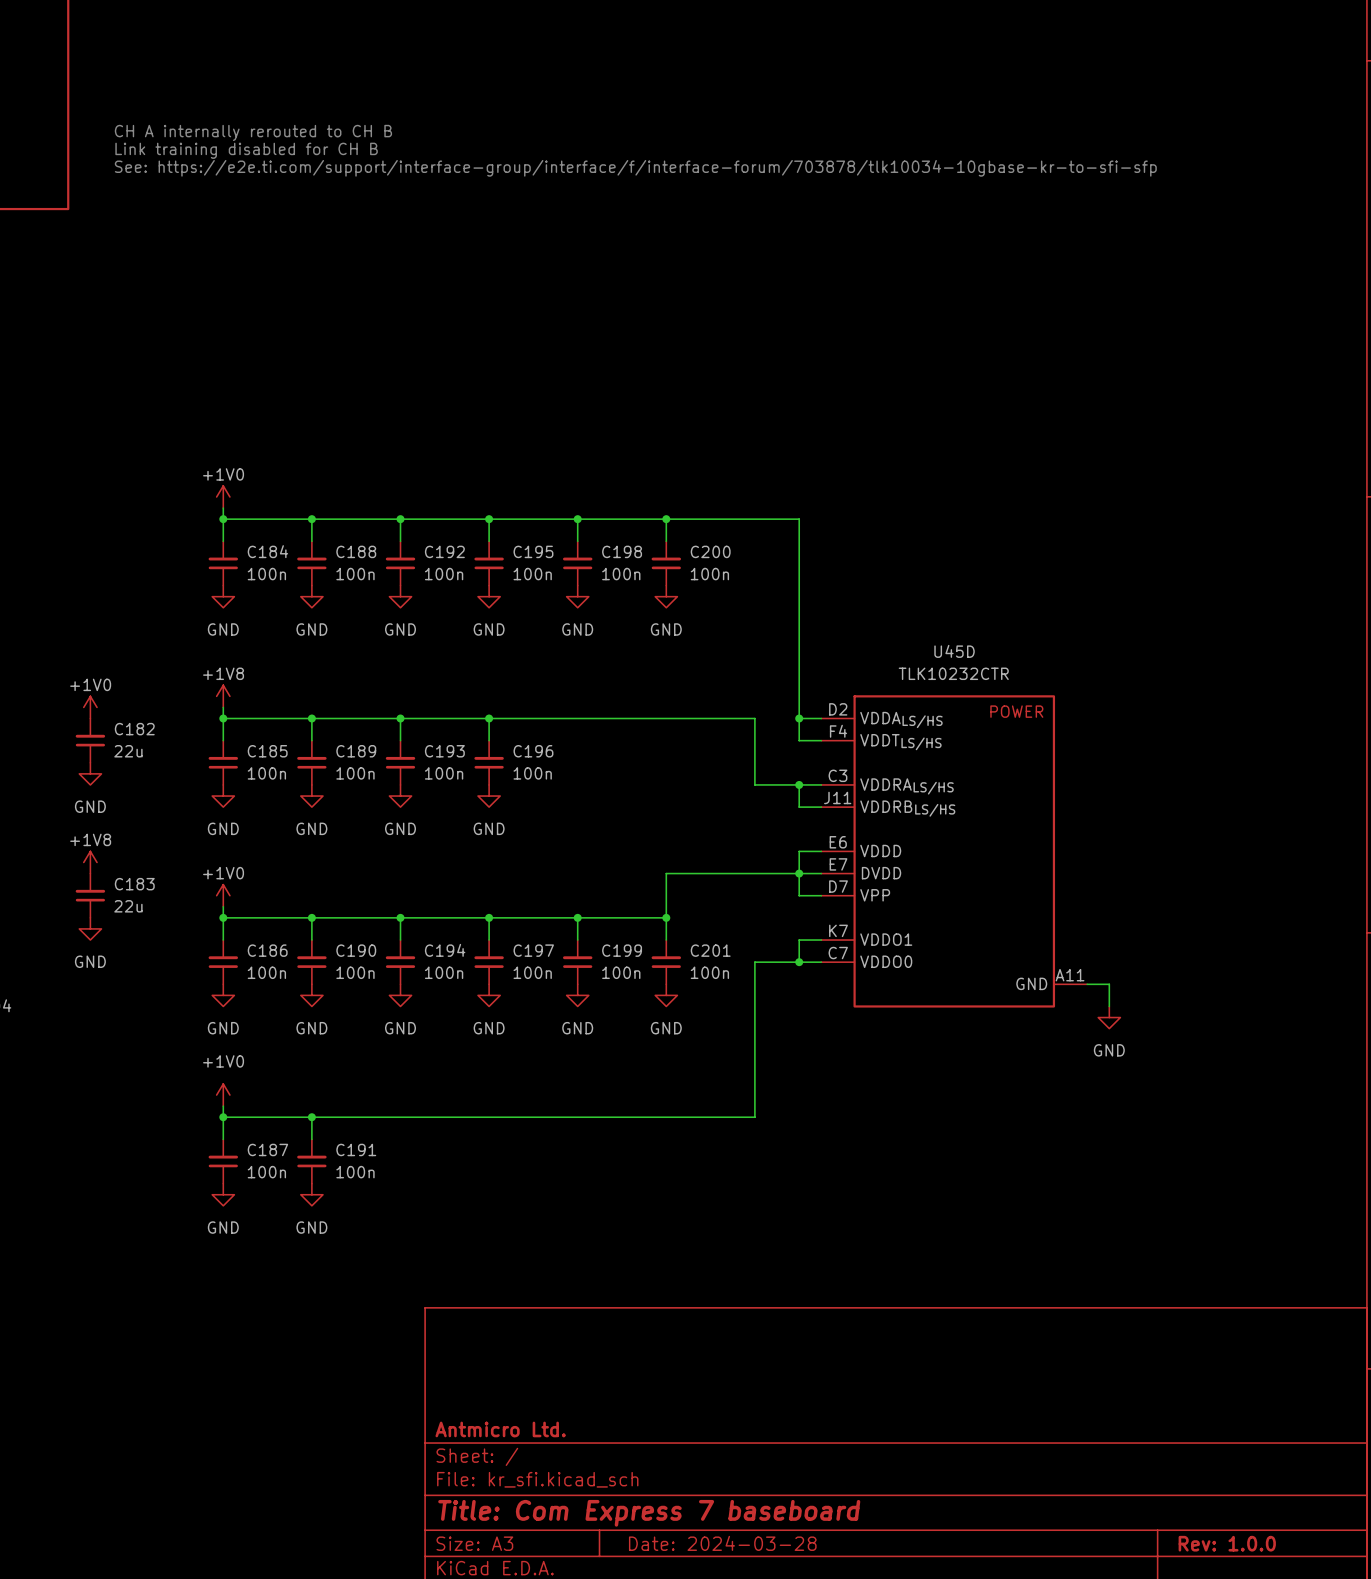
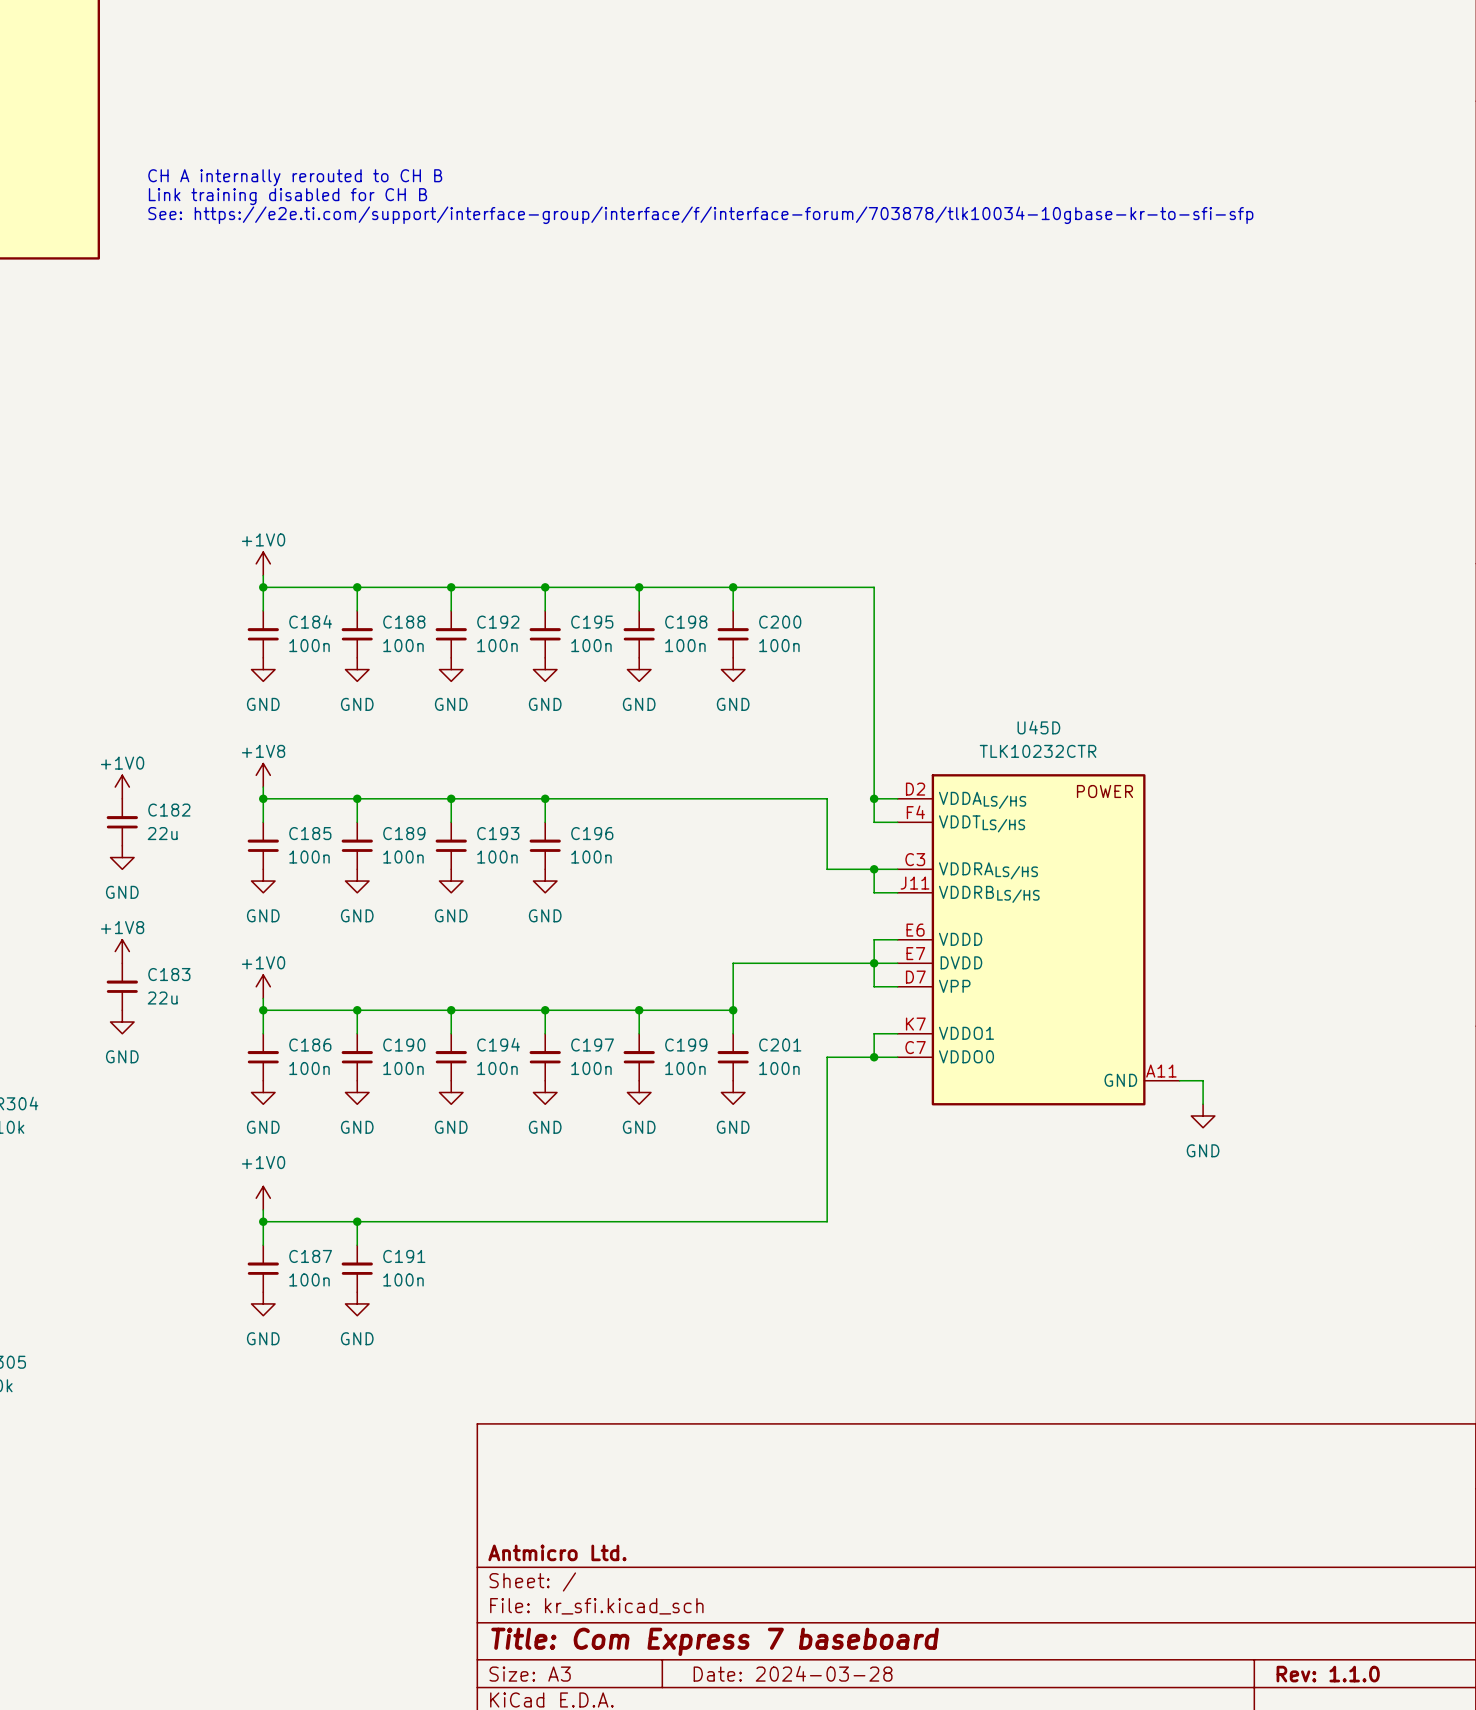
title block: Rev: 1.0.0 (1227, 1543) -> Rev: 1.1.0 (1328, 1674)

